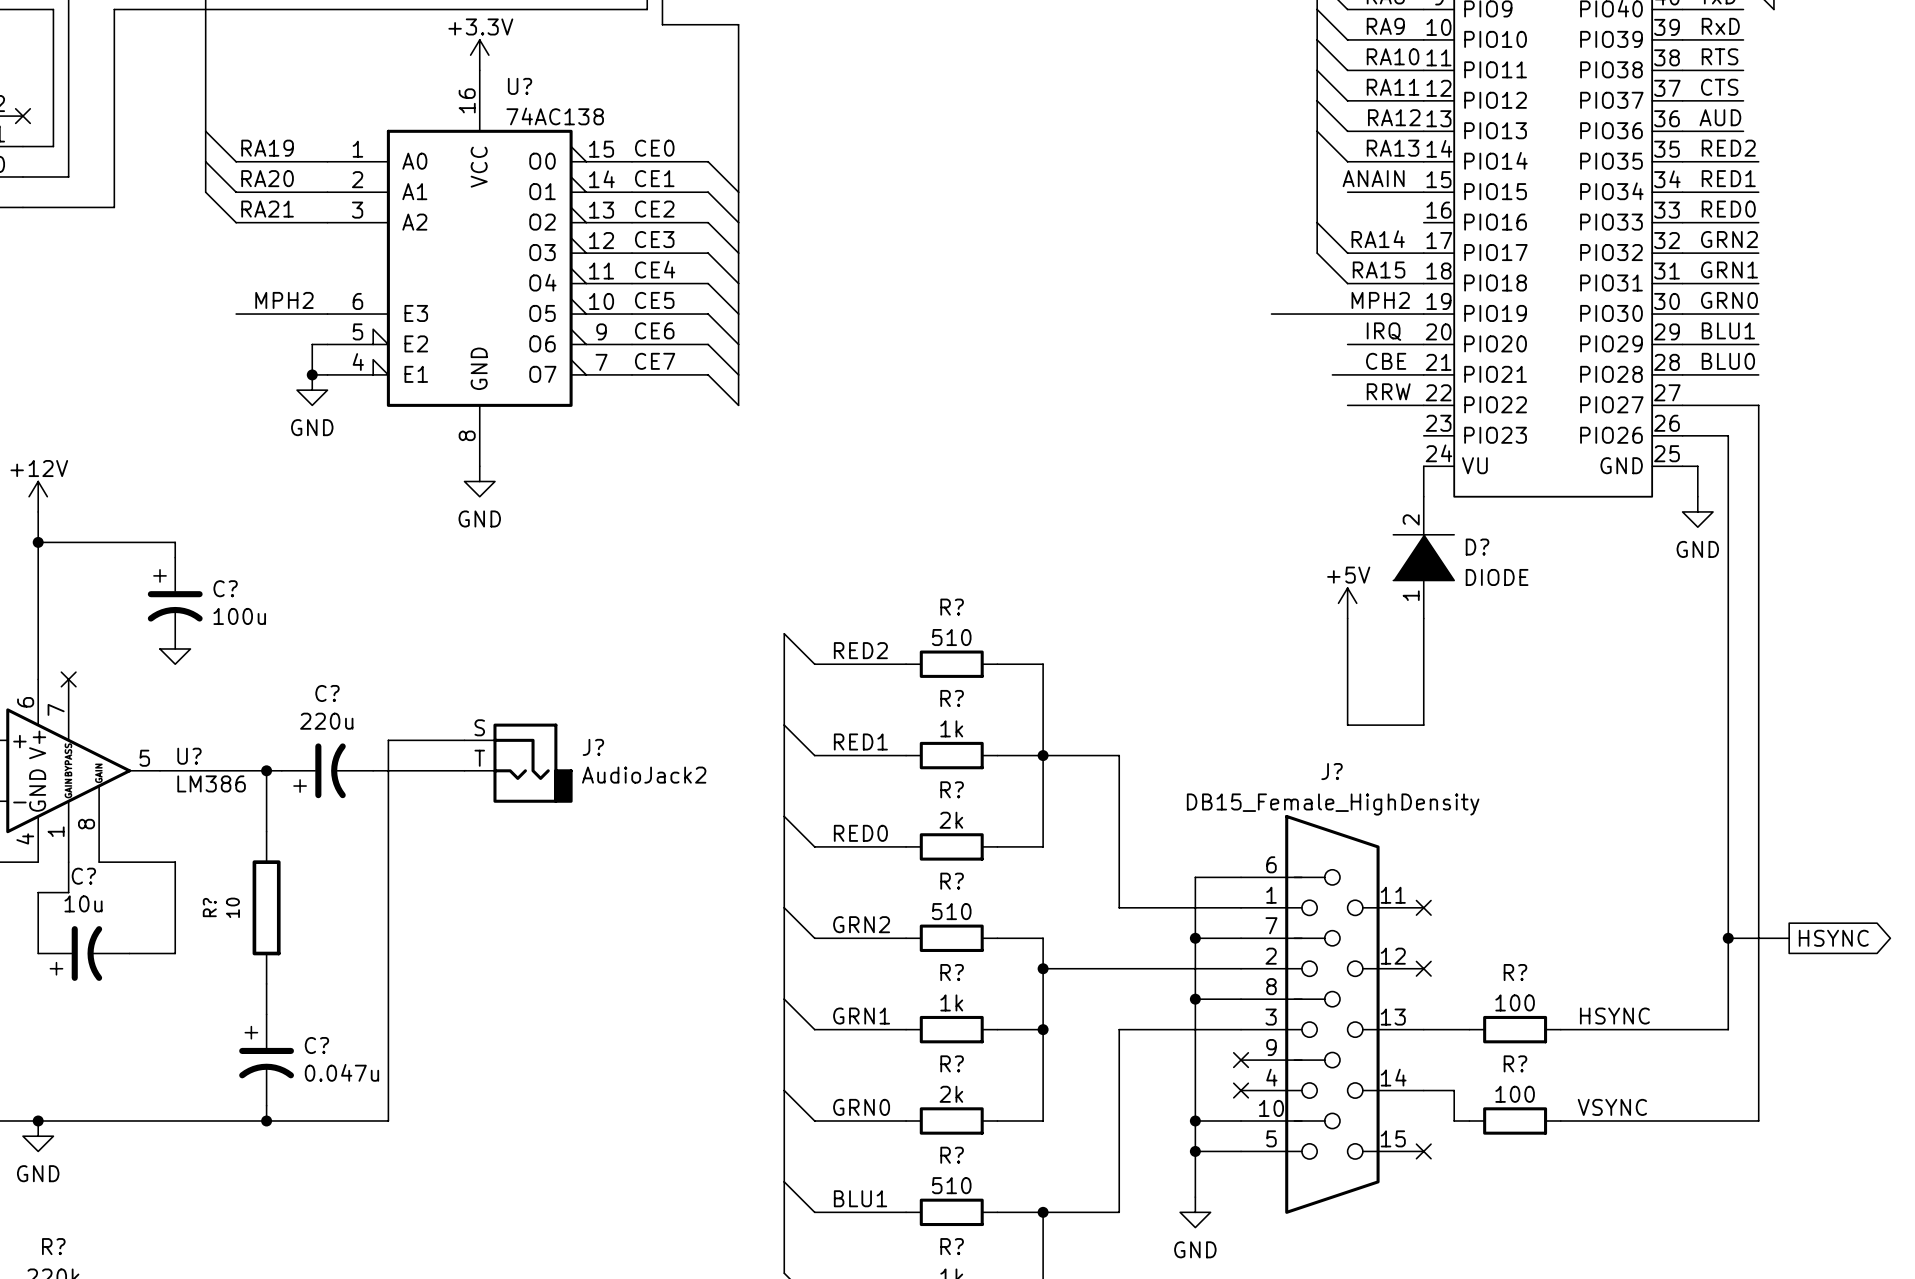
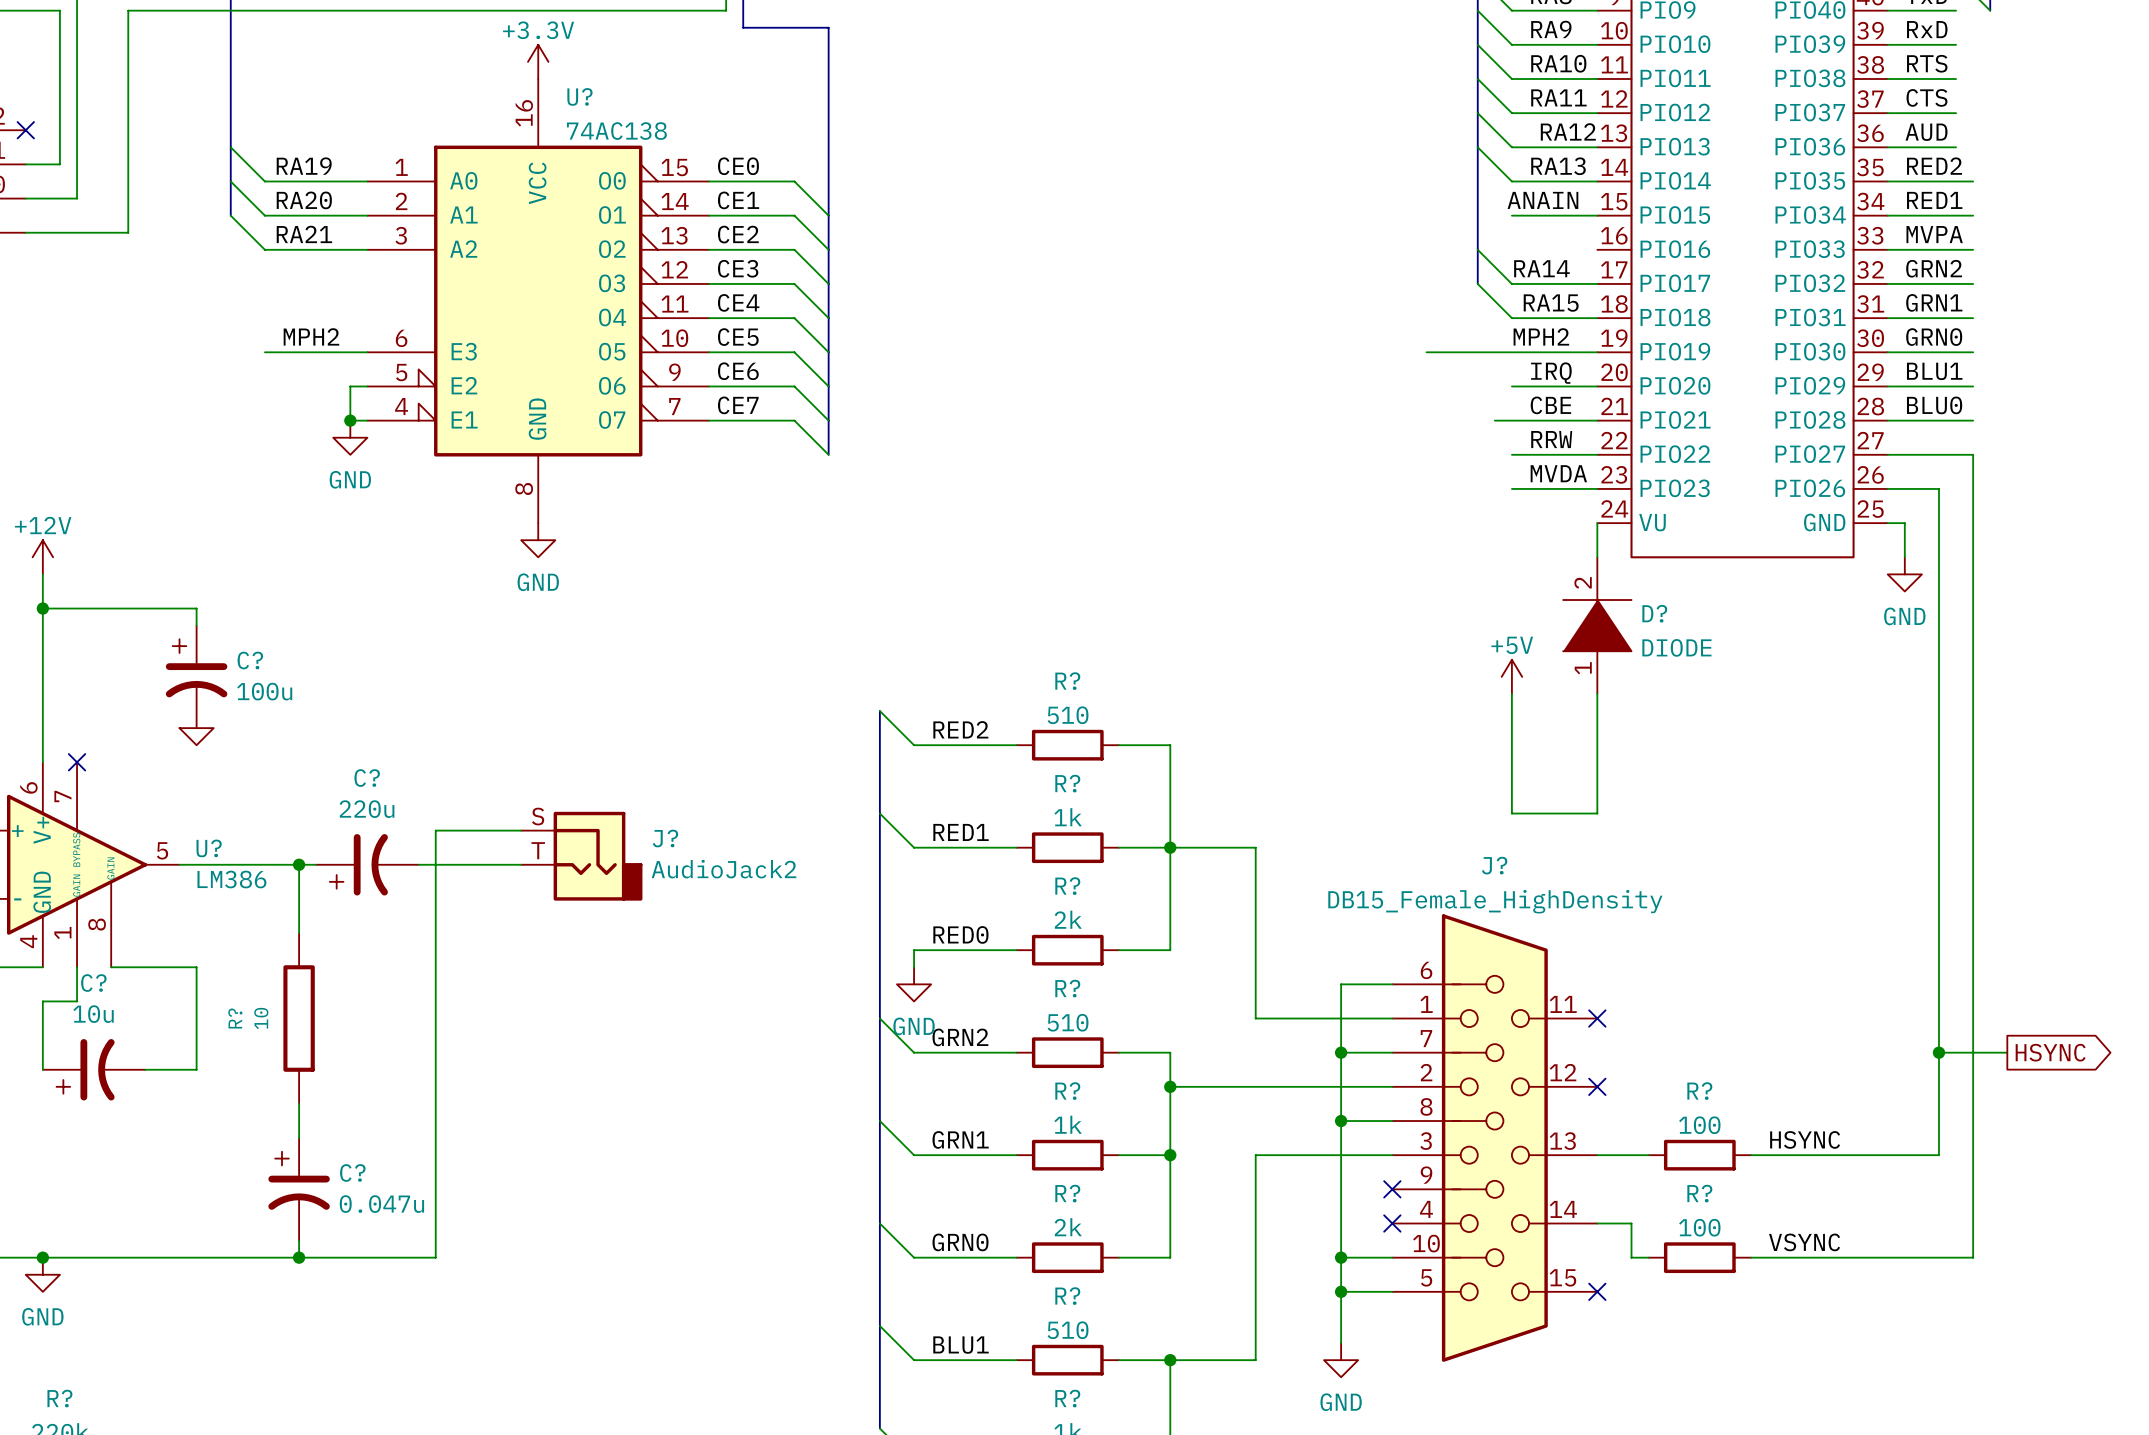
label: RED0 (1728, 209) -> MVPA (1934, 234)
label: none -> MVDA (1558, 473)
wire: none -> (1511, 488) (1597, 488)
wire: (784, 816) (814, 846) -> (914, 967) (914, 950)
power symbol: none -> GND (914, 984)

